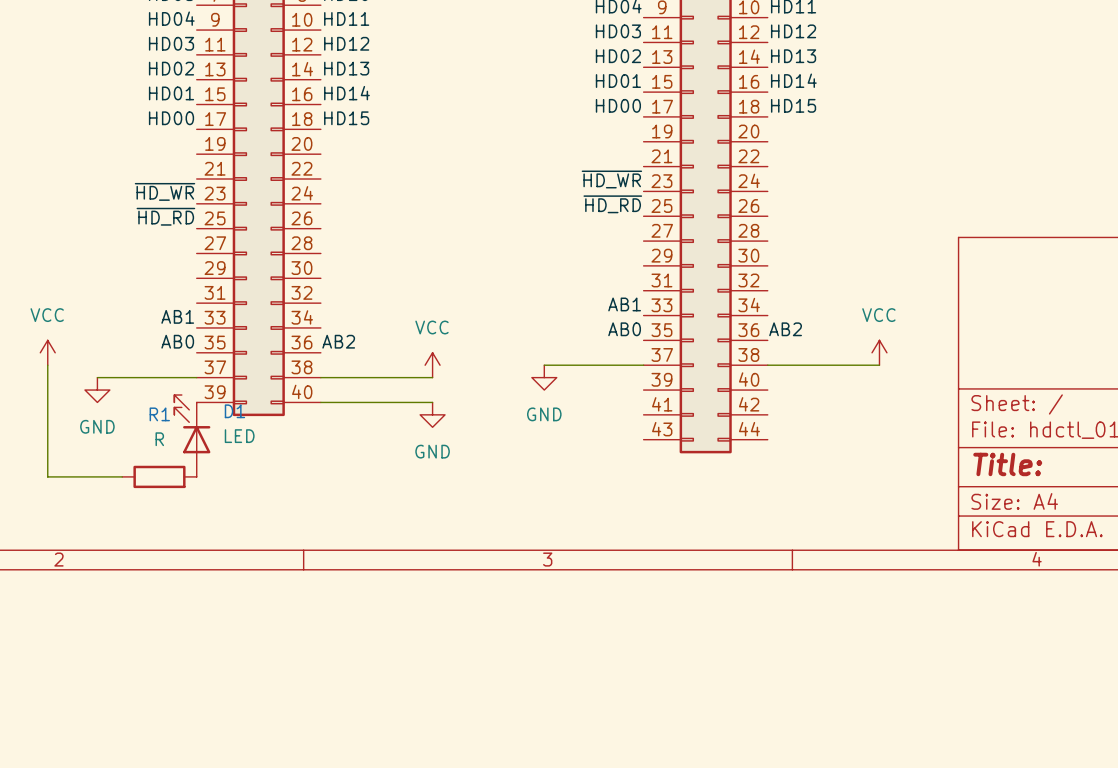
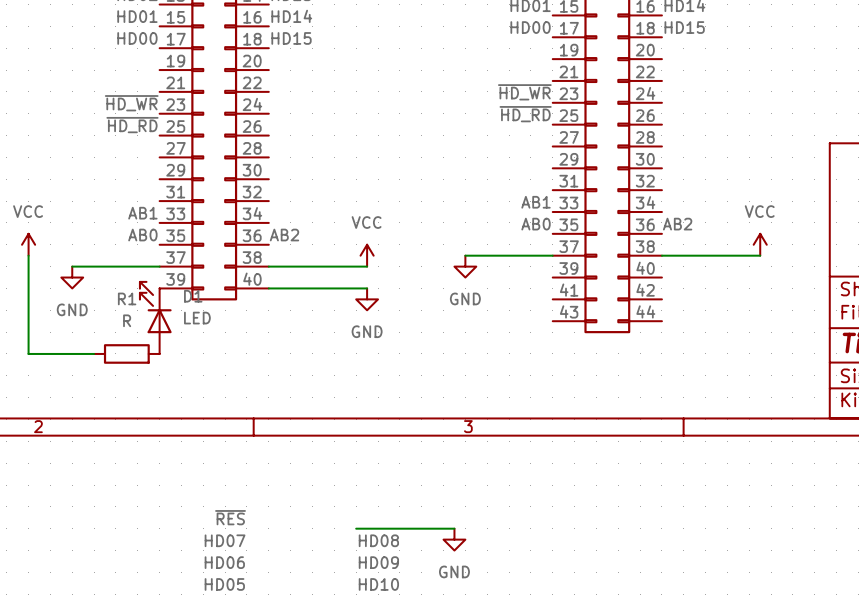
label: none -> ~{RES} (230, 517)
wire: none -> (356, 528) (454, 528)
power symbol: none -> GND (454, 539)
label: none -> HD07 (225, 540)
label: none -> HD08 (378, 540)
label: none -> HD06 (224, 562)
label: none -> HD09 (378, 562)
label: none -> HD05 (224, 584)
label: none -> HD10 (378, 584)

